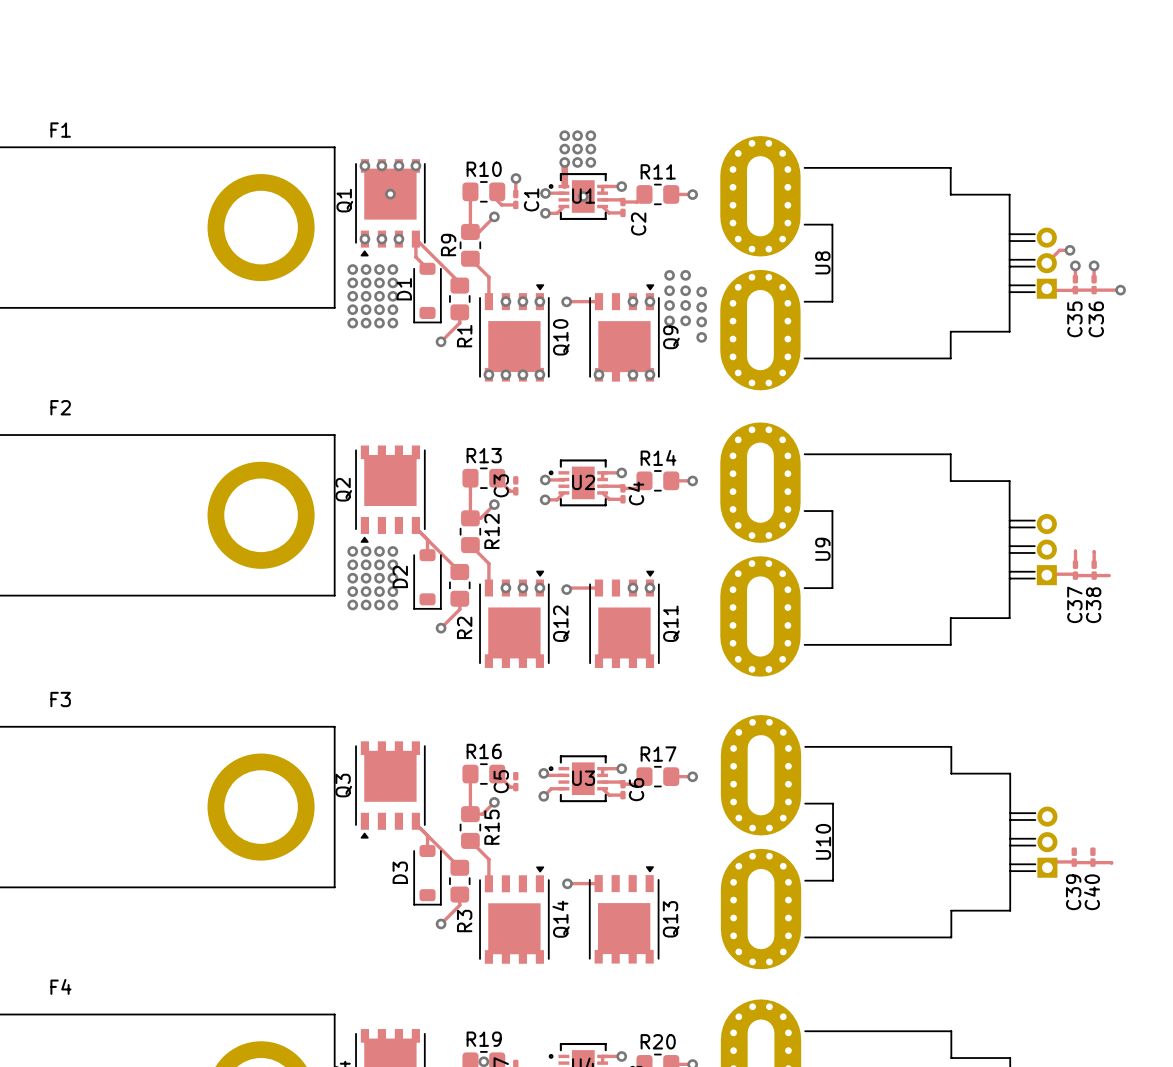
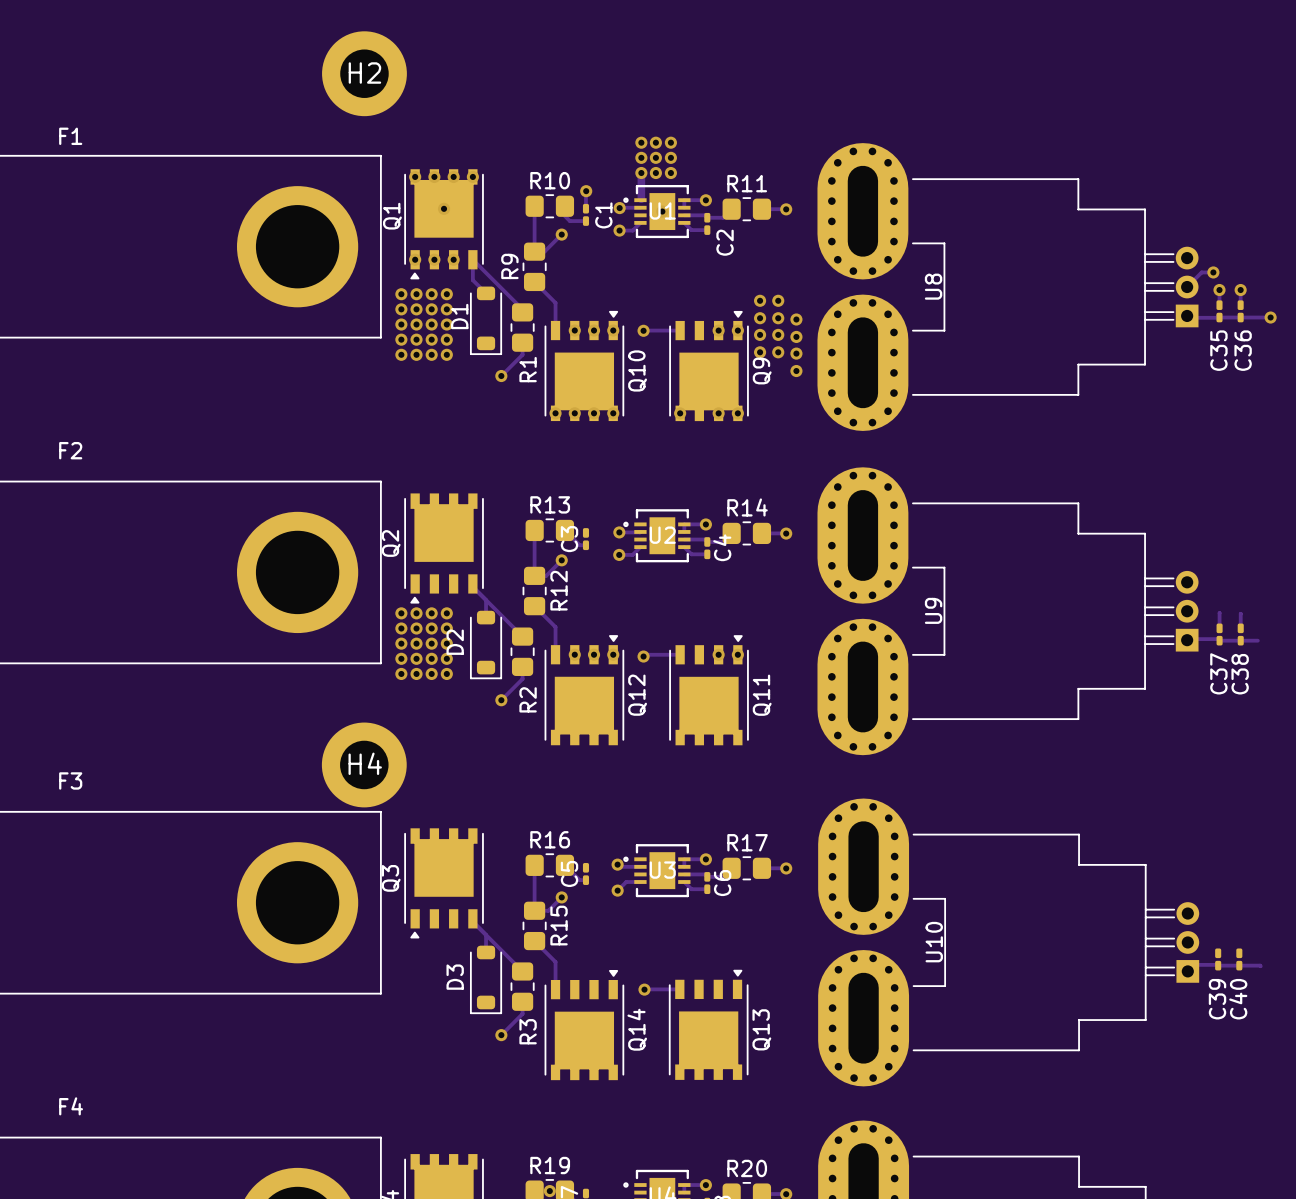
H2: none -> (364, 73)
H4: none -> (364, 764)

